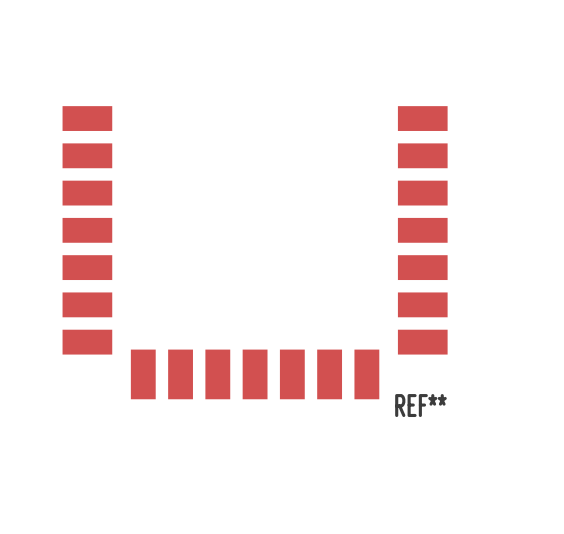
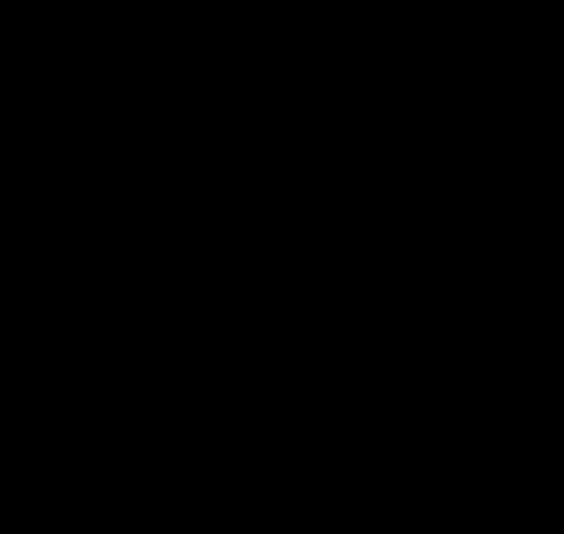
part: (255, 252) -> none

